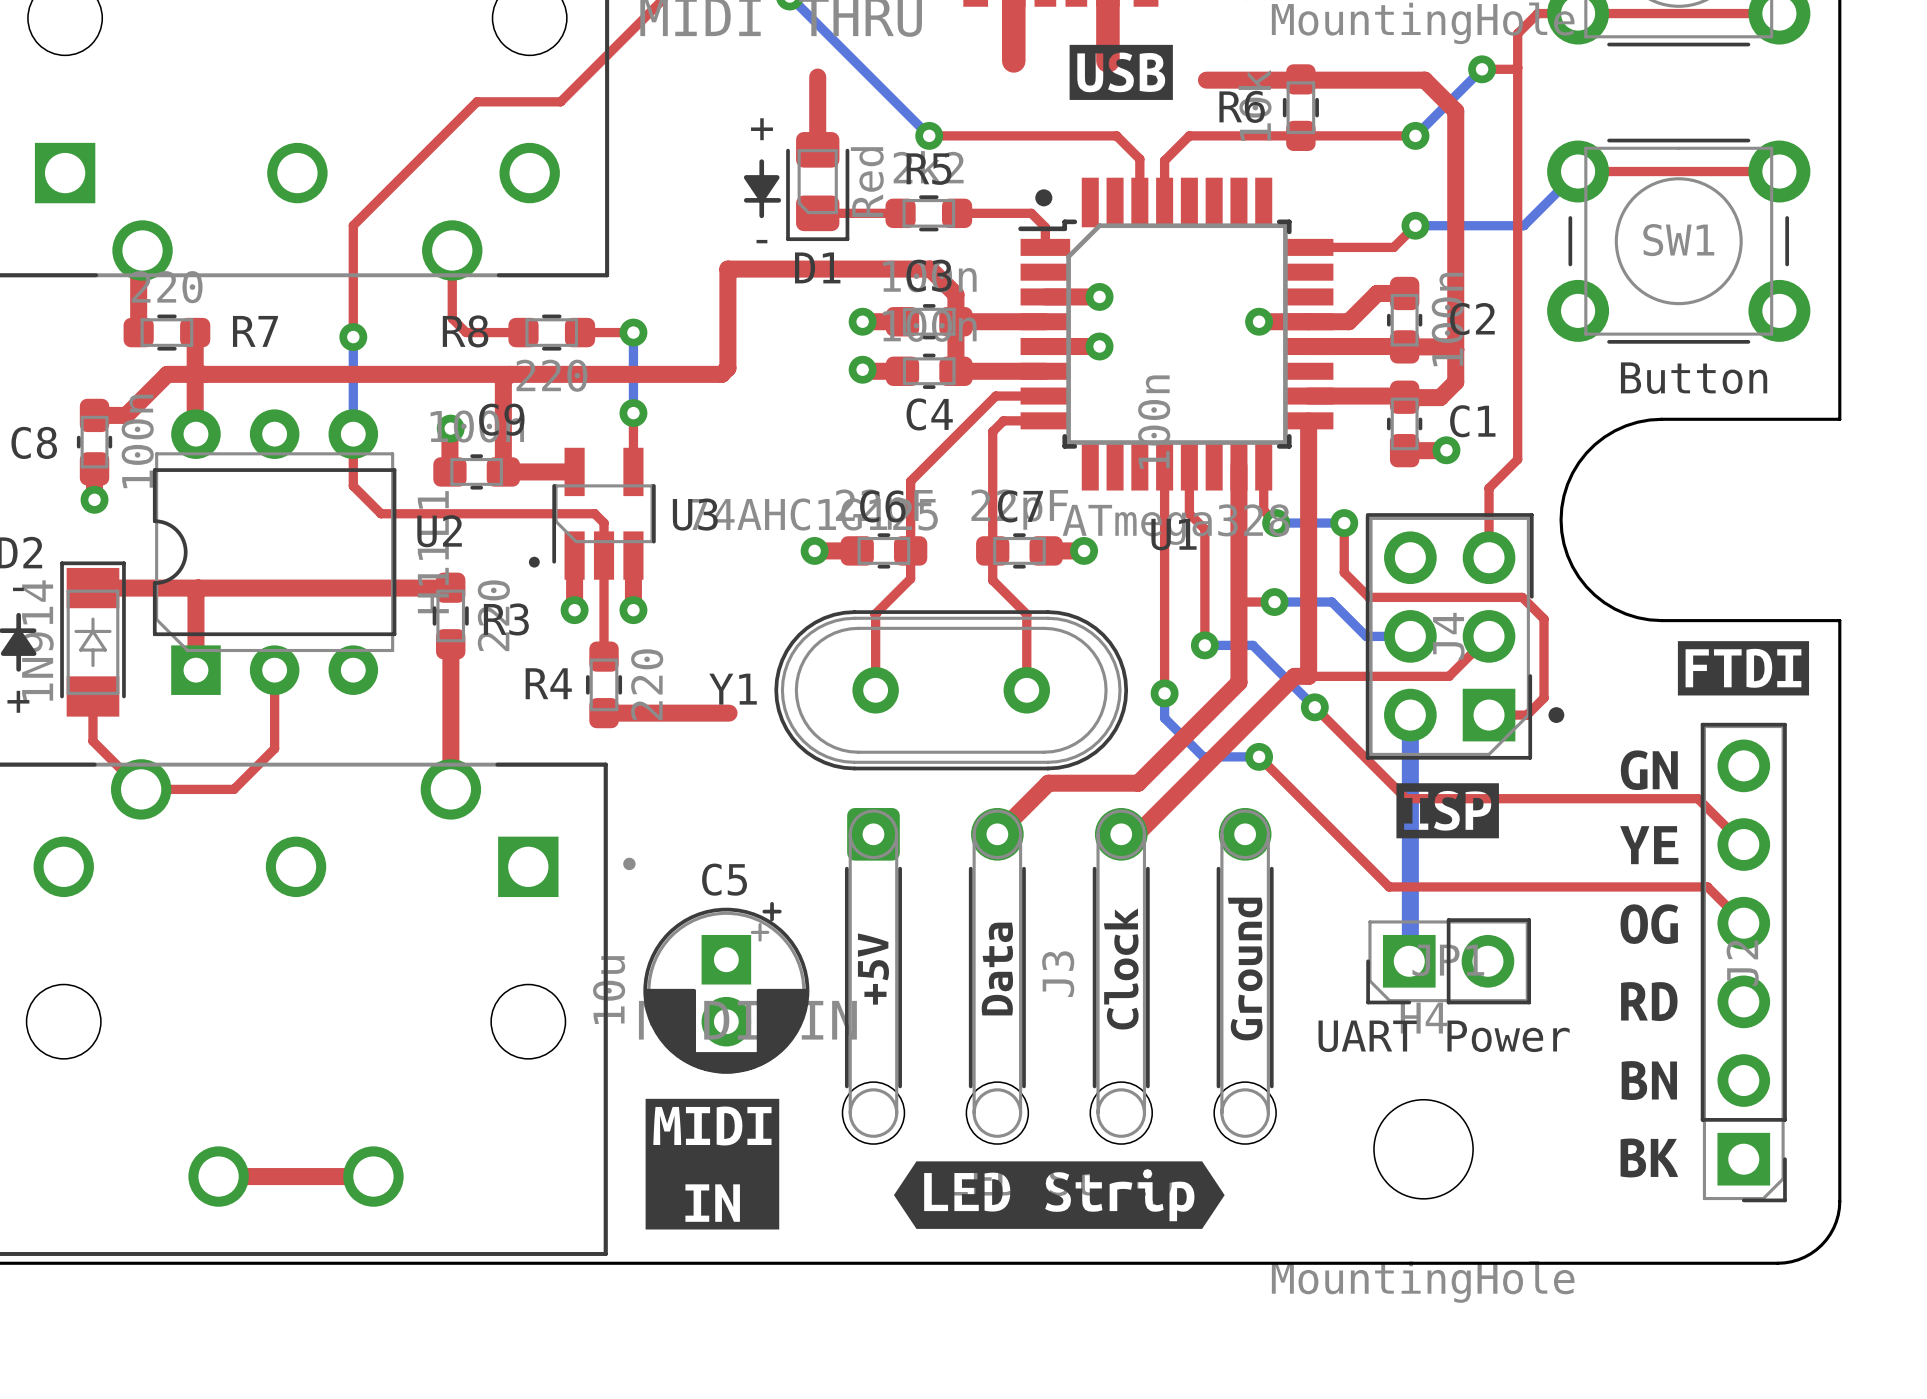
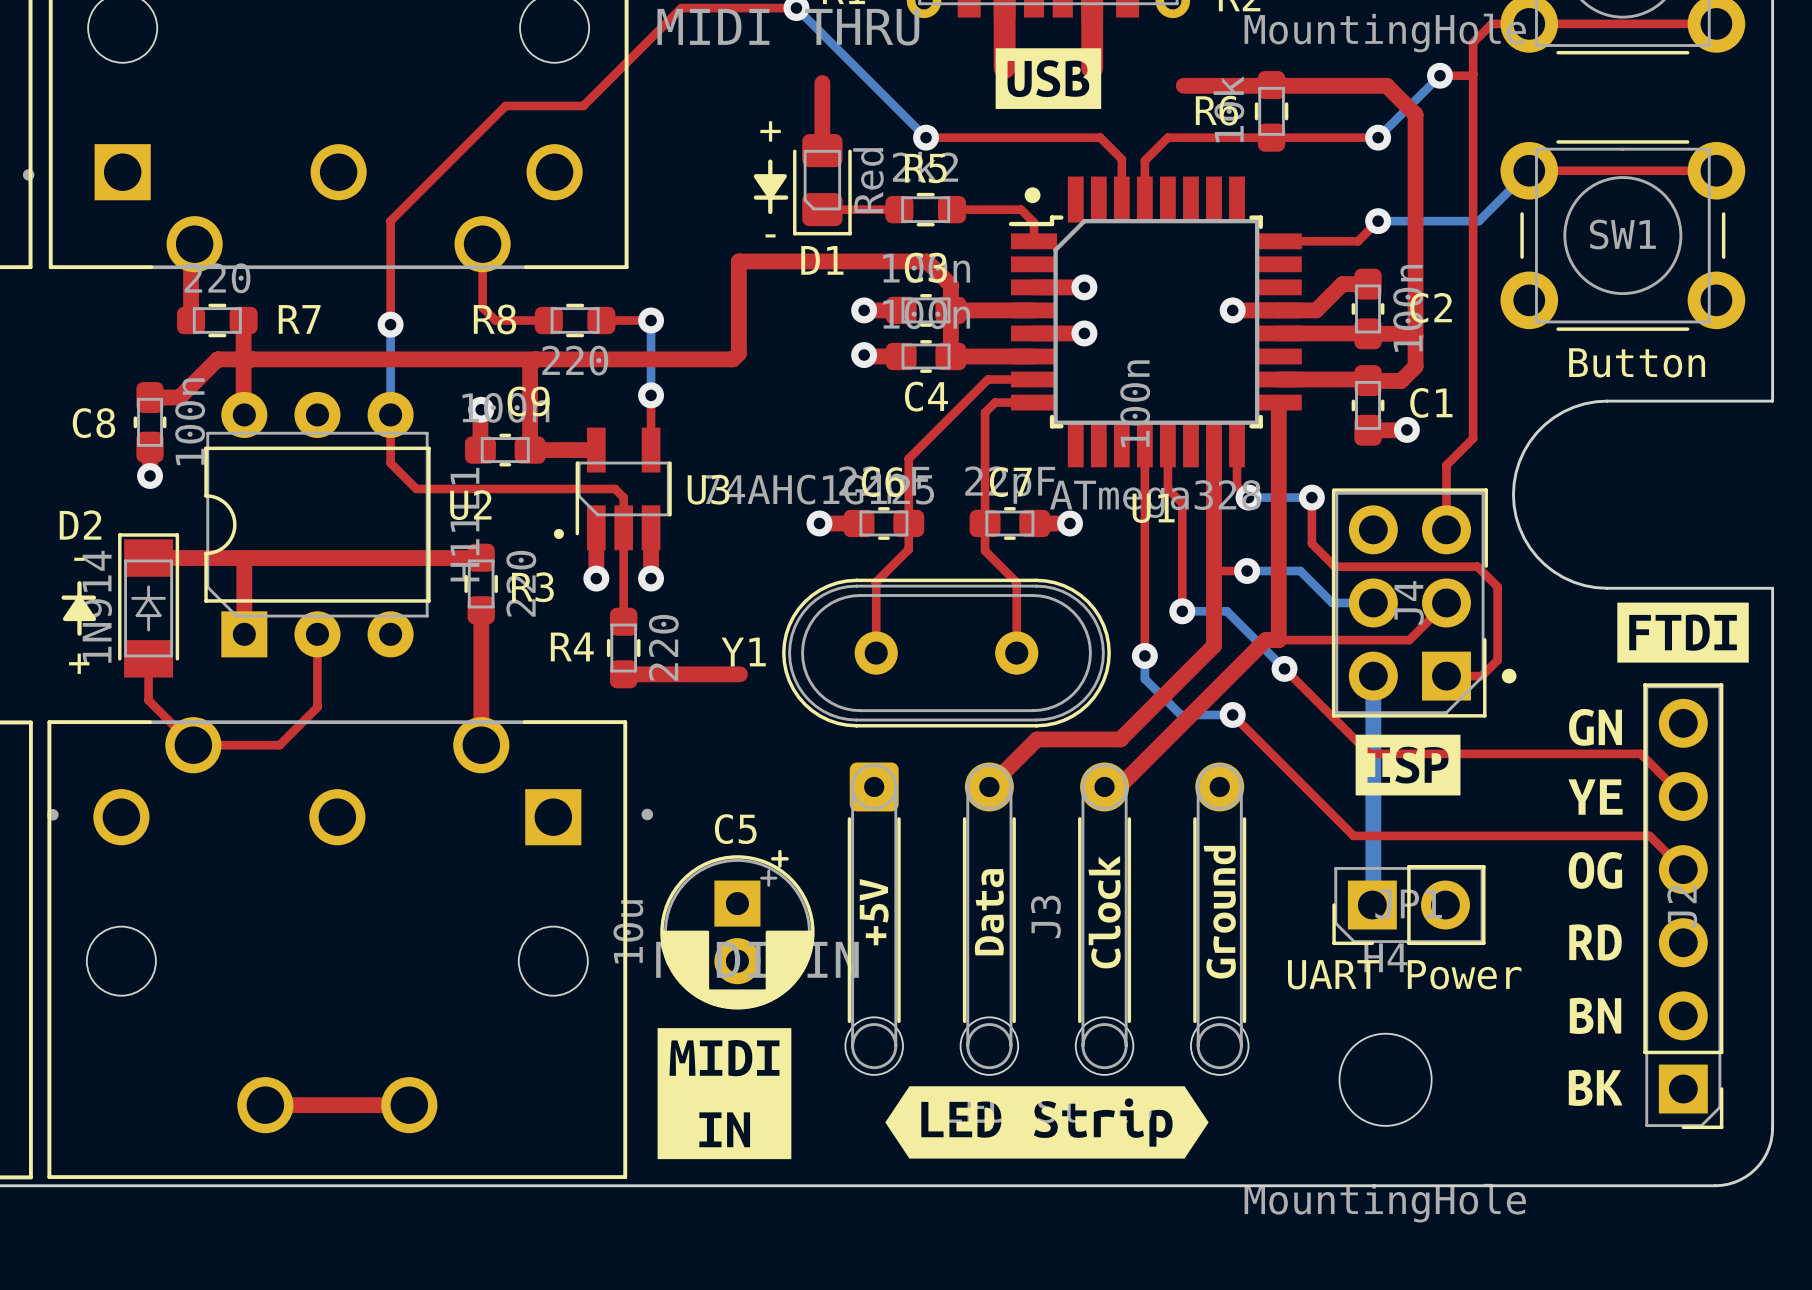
drawing: none -> [995, 48, 1102, 109]
drawing: [1069, 44, 1173, 100] -> none
drawing shape: [1677, 641, 1810, 696] -> [1617, 602, 1749, 663]
drawing shape: [1396, 783, 1499, 839] -> [1355, 734, 1461, 796]
drawing shape: [645, 1098, 780, 1230] -> [657, 1028, 792, 1160]
drawing shape: [893, 1161, 1225, 1229] -> [885, 1086, 1209, 1159]

